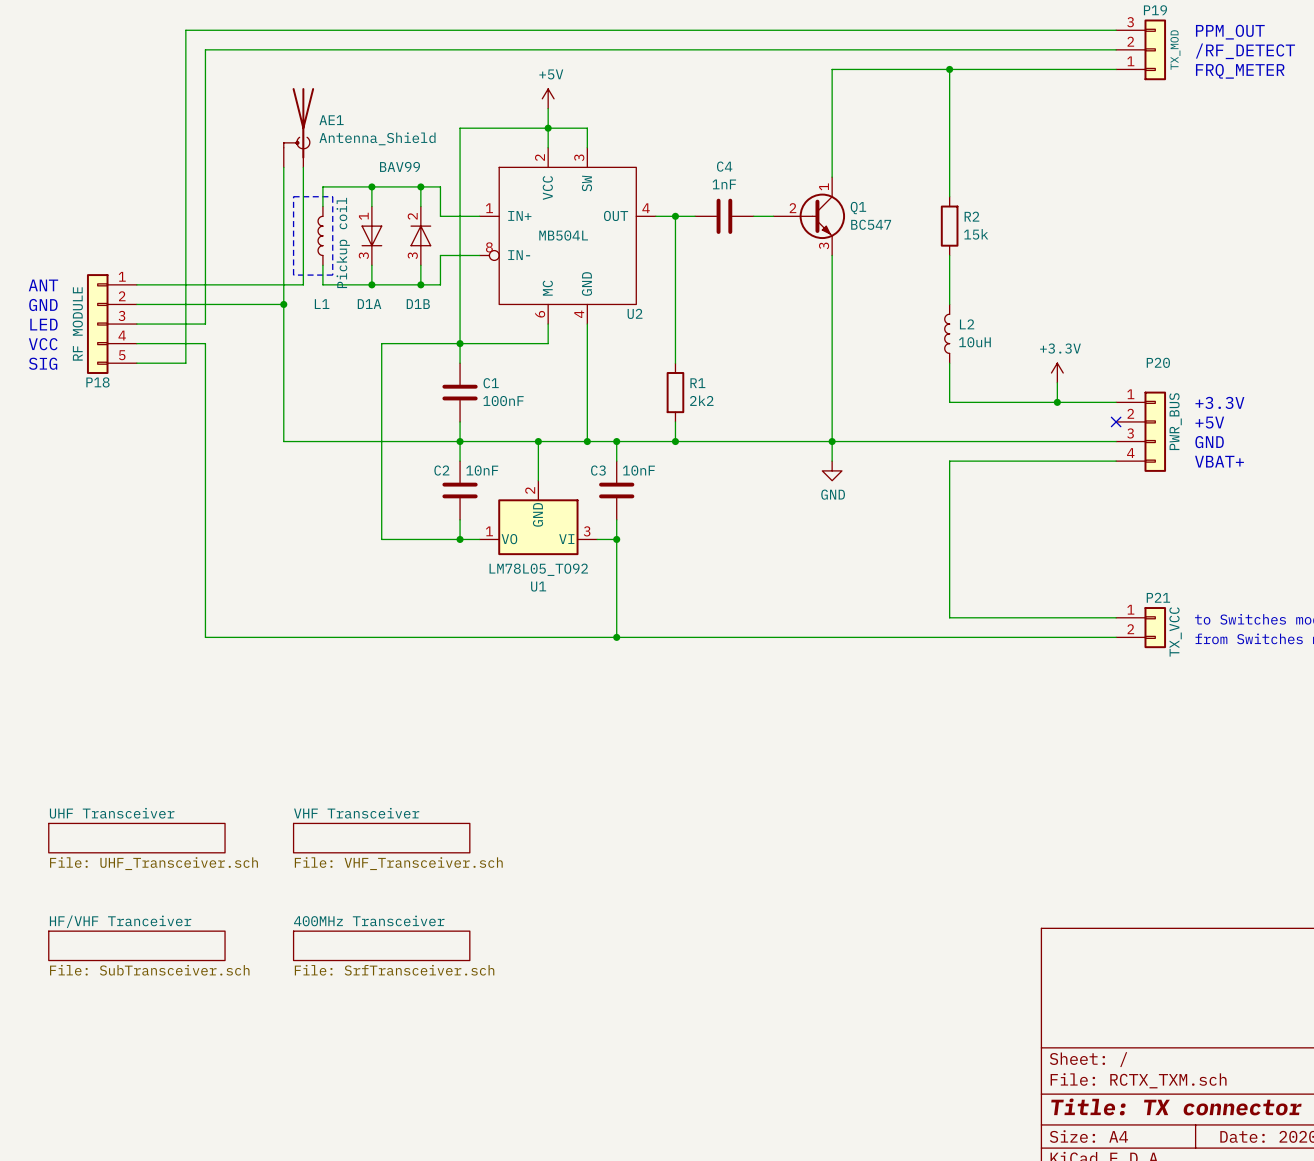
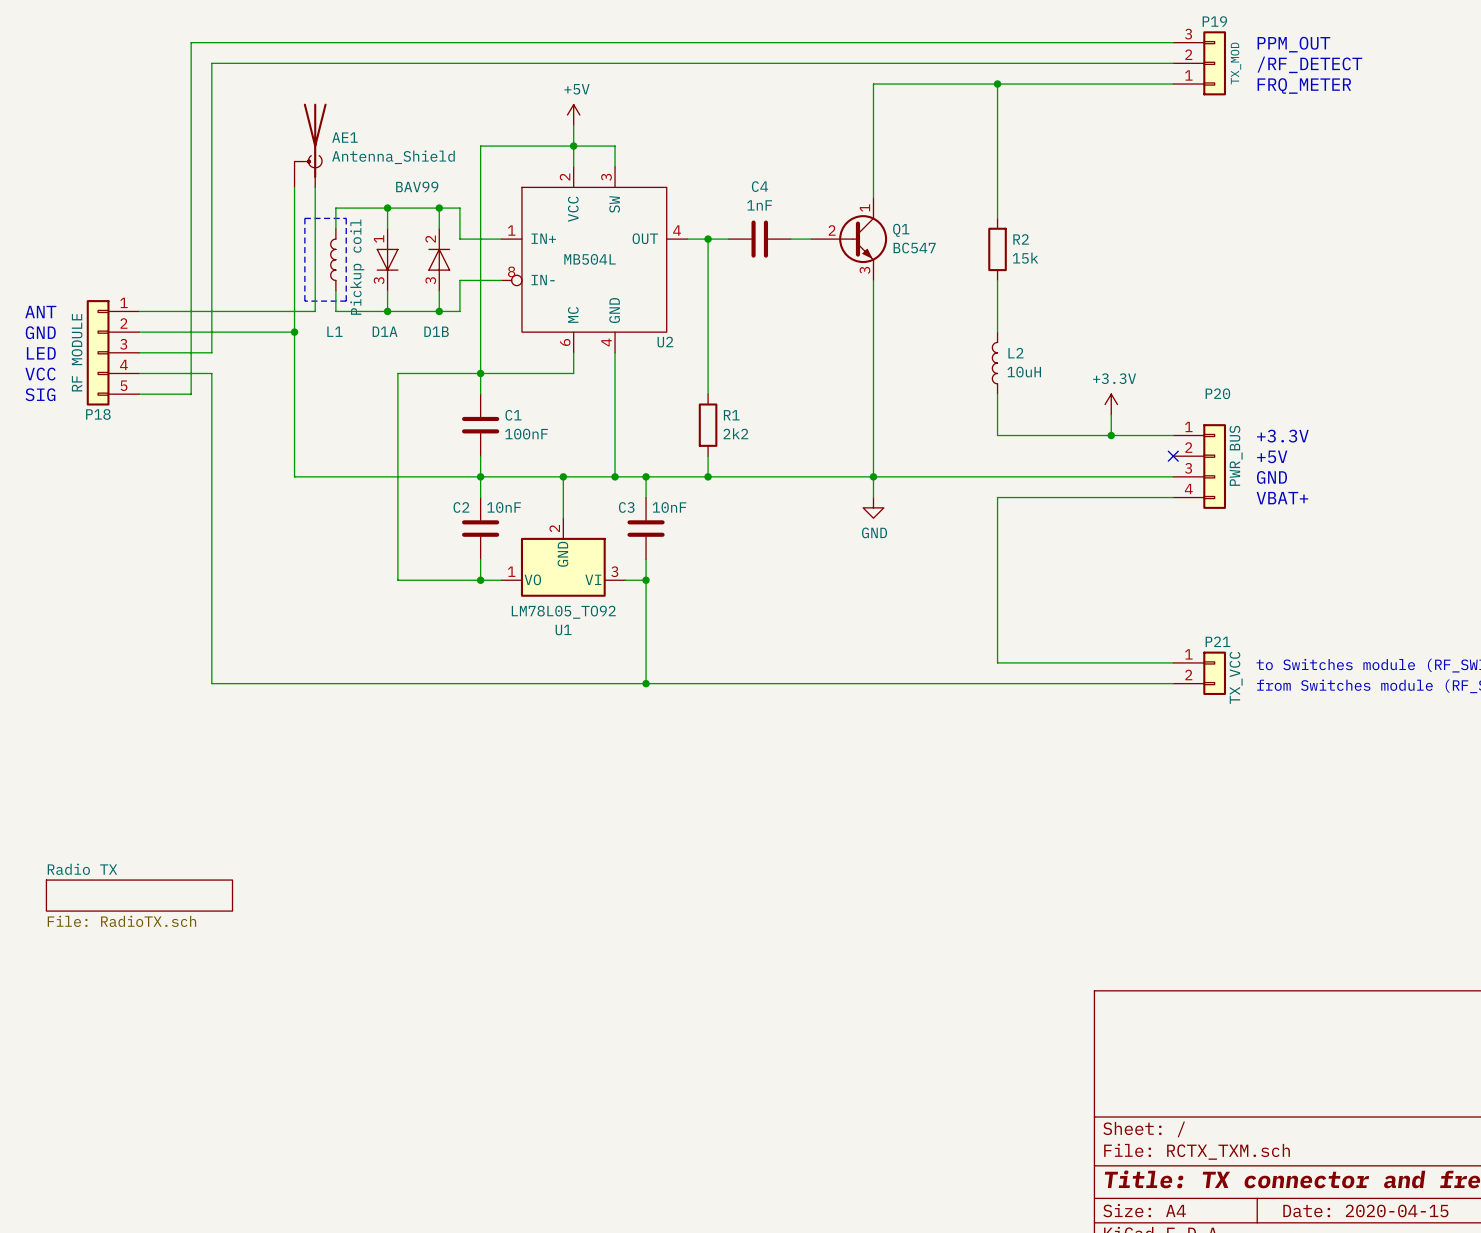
sheet UHF Transceiver name: UHF Transceiver (112, 813) -> Radio TX (82, 869)
sheet VHF Transceiver: File: VHF_Transceiver.sch (381, 838) -> none
sheet UHF Transceiver value: File: UHF_Transceiver.sch (153, 863) -> File: RadioTX.sch (121, 921)
sheet HF/VHF Tranceiver: File: SubTransceiver.sch (136, 945) -> none
sheet 400MHz Transceiver: File: SrfTransceiver.sch (381, 945) -> none

